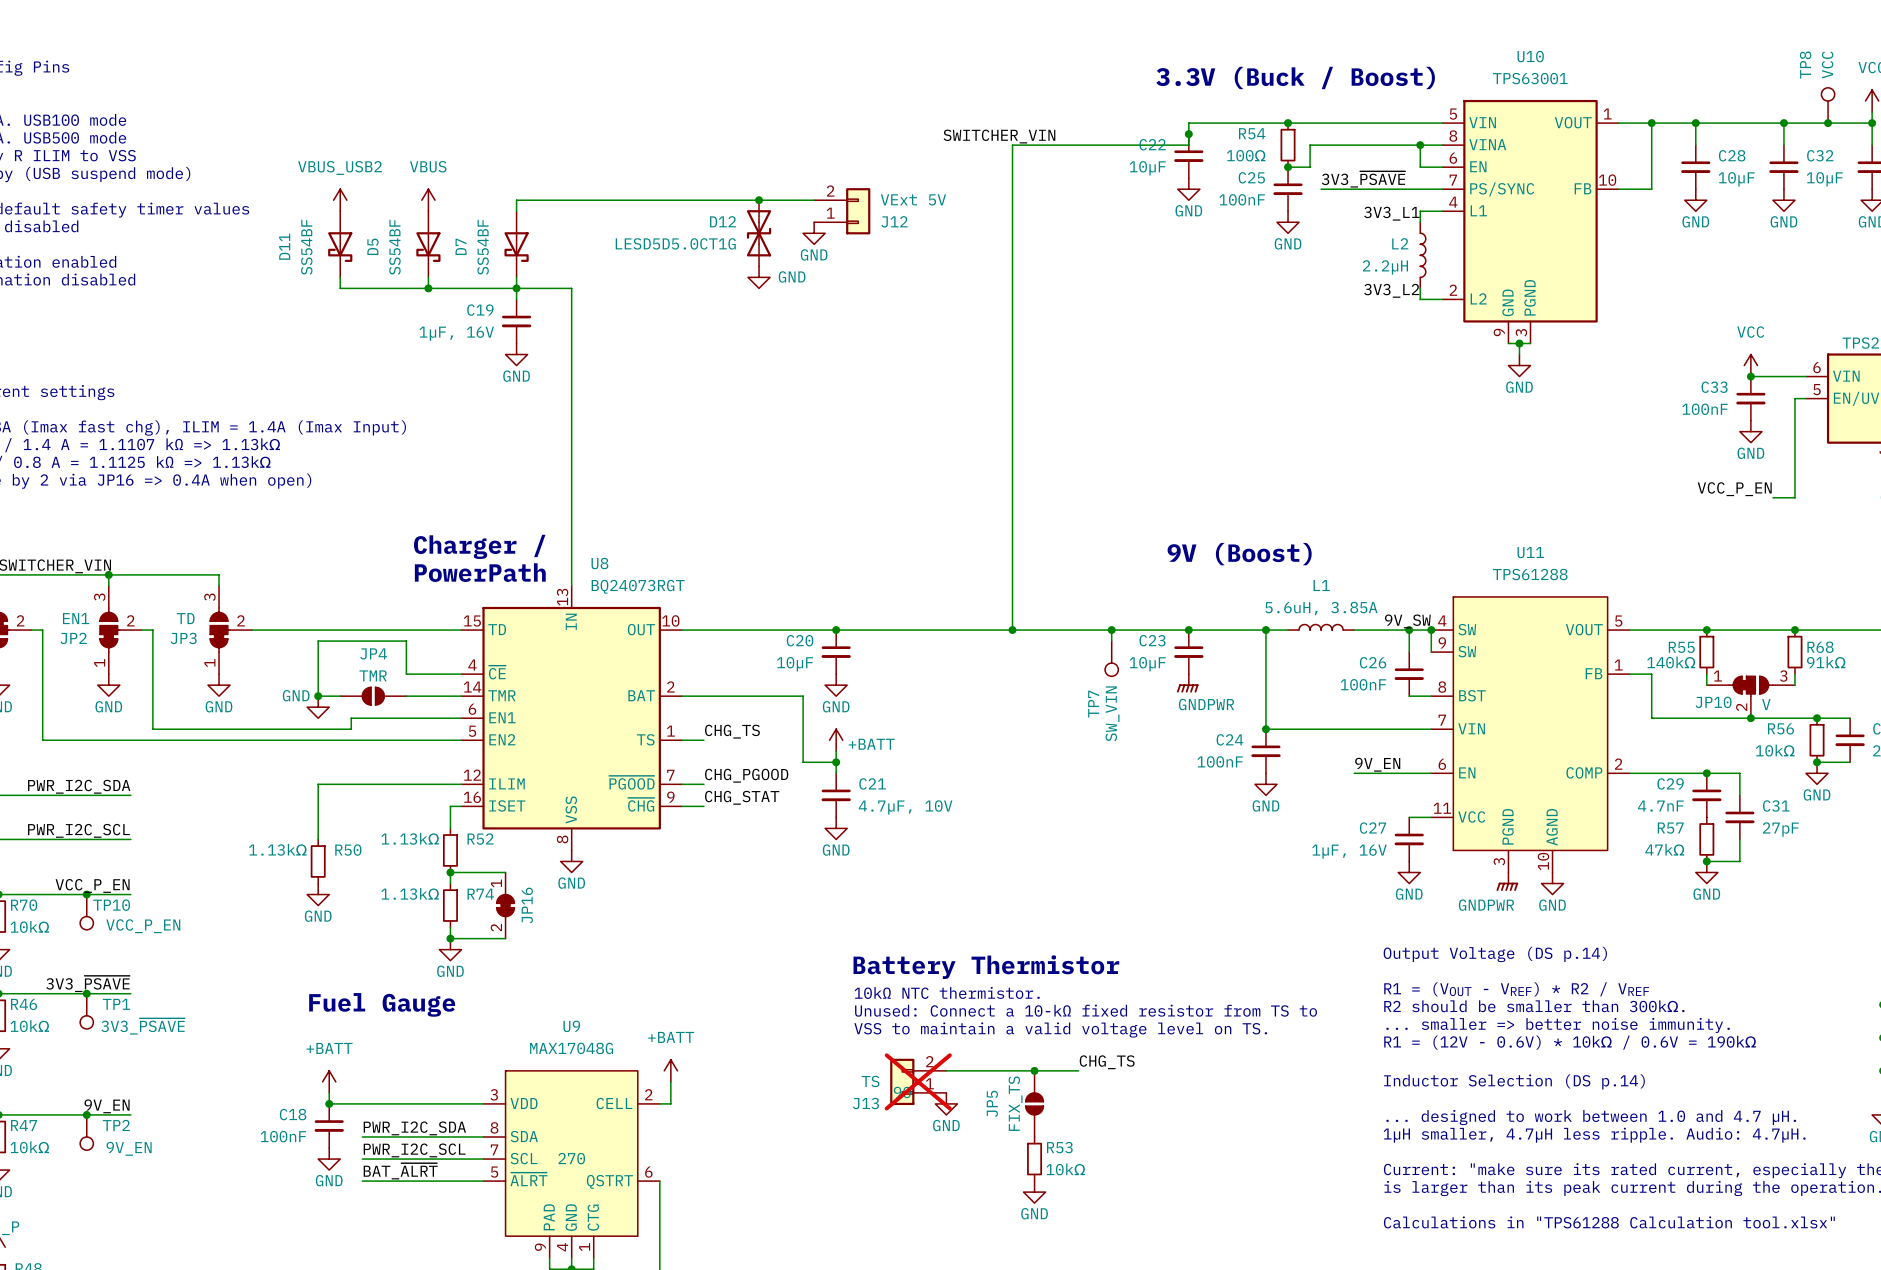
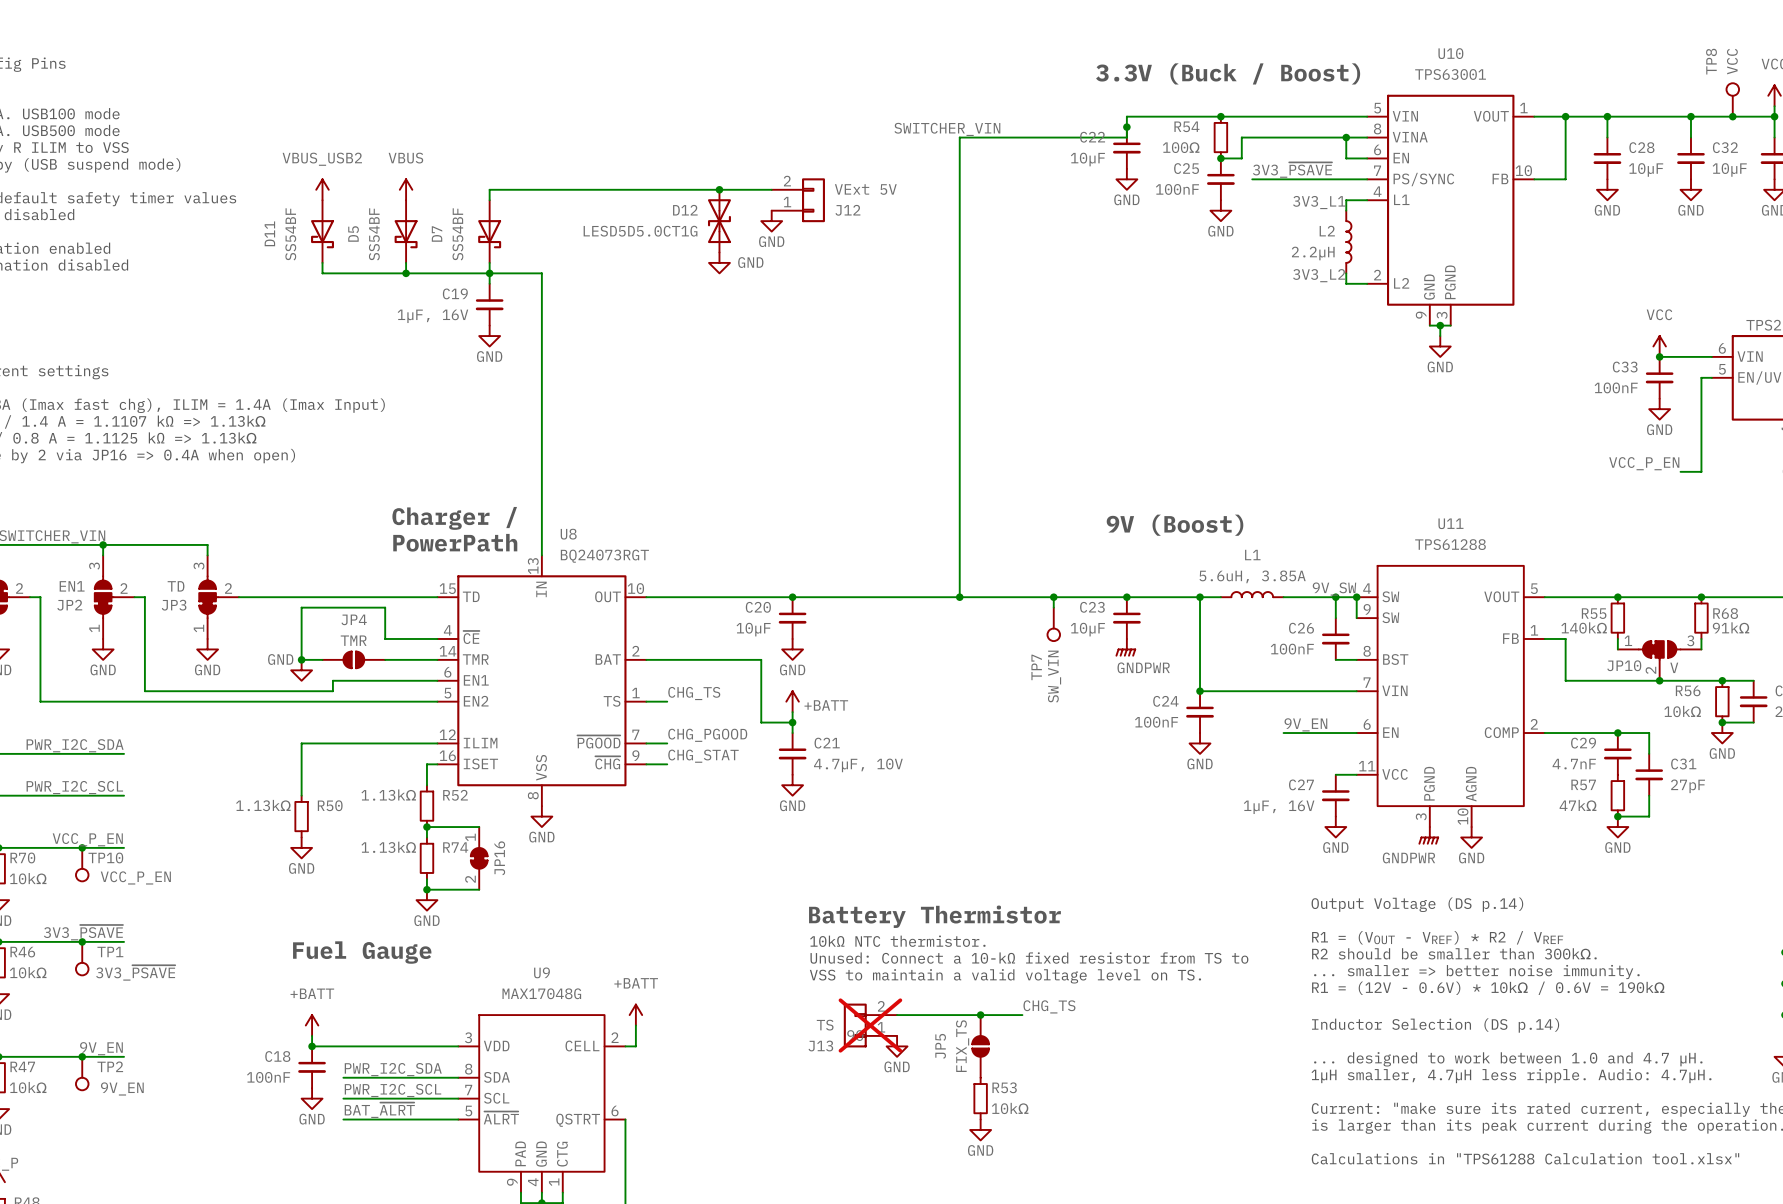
U9 text: 270 (571, 1158) -> none

